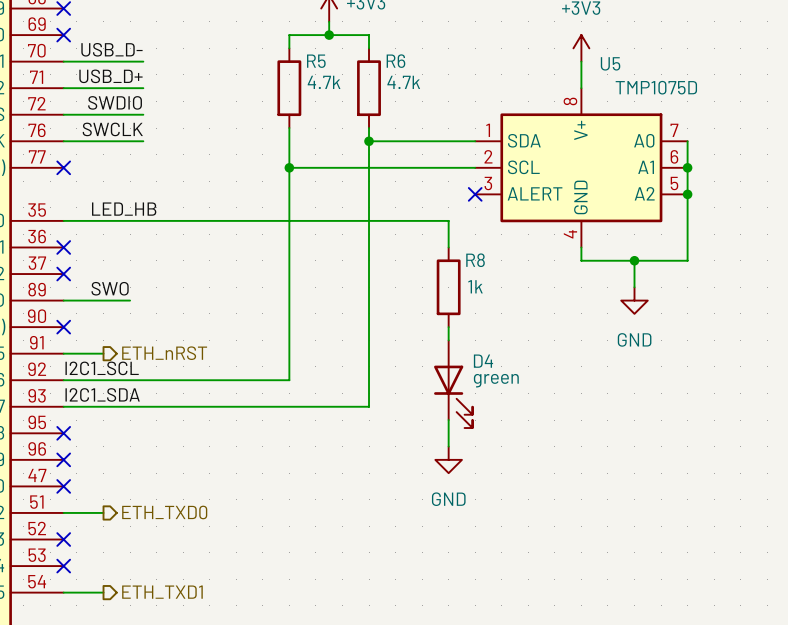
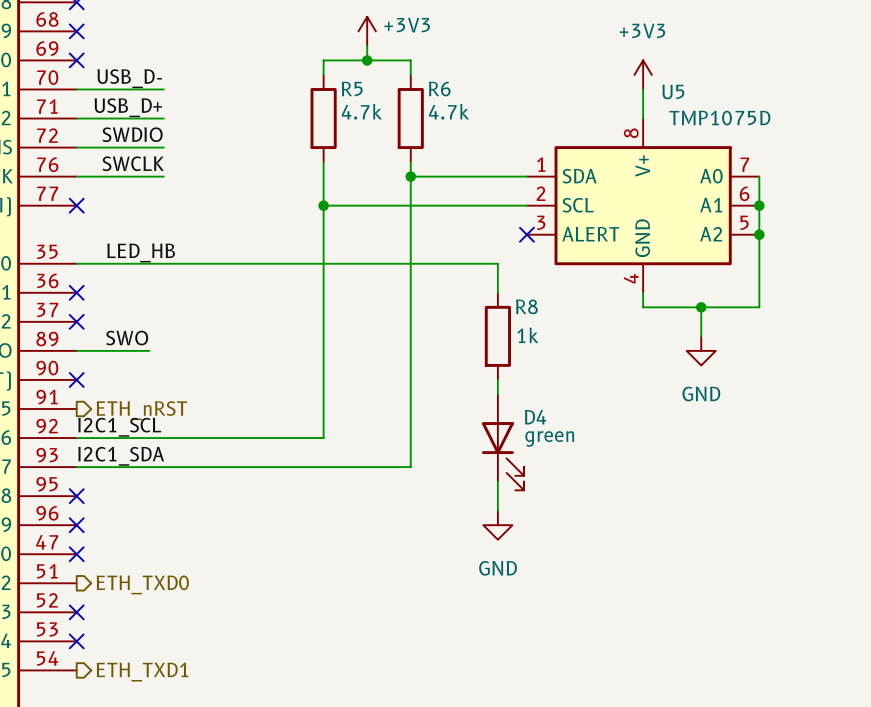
wire: (63, 353) (103, 353) -> none
hierarchical label position: ETH_nRST (164, 353) -> ETH_nRST (141, 410)
wire: (63, 512) (103, 512) -> none
hierarchical label position: ETH_TXD0 (164, 512) -> ETH_TXD0 (142, 584)
wire: (63, 592) (103, 592) -> none
hierarchical label position: ETH_TXD1 (162, 592) -> ETH_TXD1 (142, 672)

